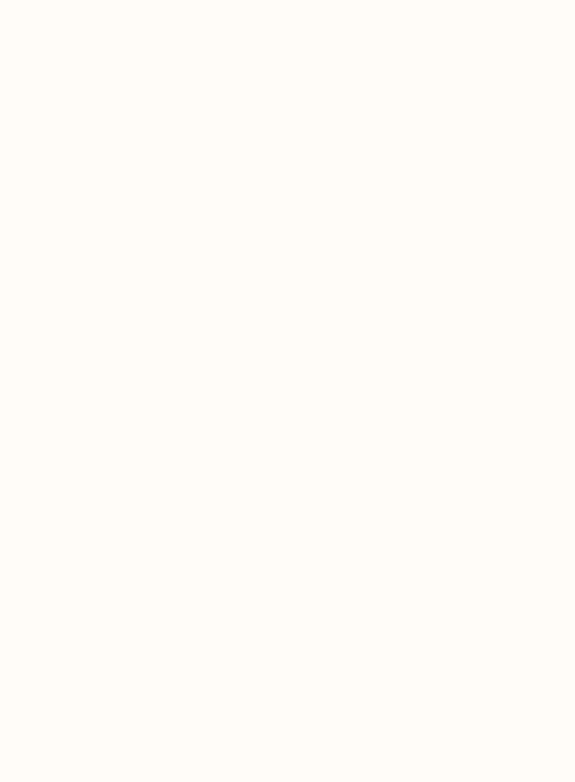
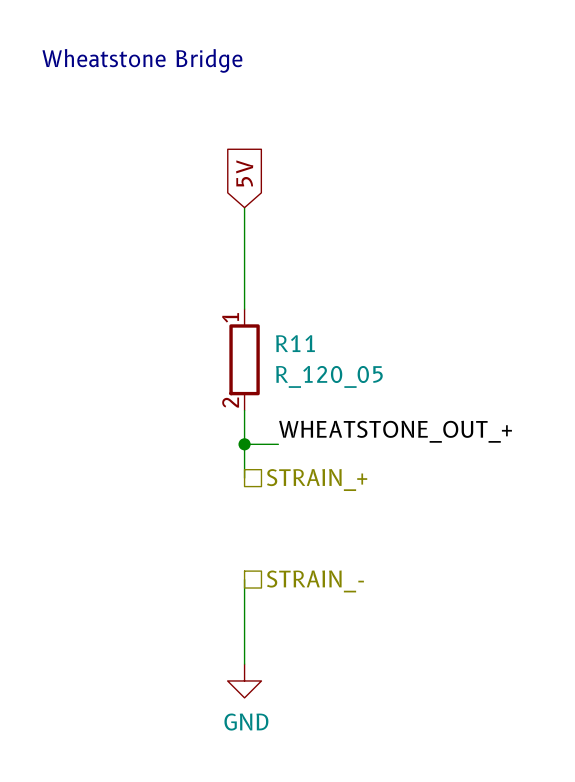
text: none -> Wheatstone Bridge (142, 60)
global label: none -> 5V (244, 173)
wire: none -> (244, 207) (244, 309)
R11: none -> R_120_05 (244, 359)
wire: none -> (244, 410) (244, 478)
label: none -> WHEATSTONE_OUT_+ (395, 431)
wire: none -> (244, 444) (278, 444)
junction: none -> (244, 444)
hierarchical label: none -> STRAIN_+ (317, 480)
wire: none -> (244, 579) (244, 664)
hierarchical label: none -> STRAIN_- (315, 581)
power symbol: none -> GND (244, 680)

